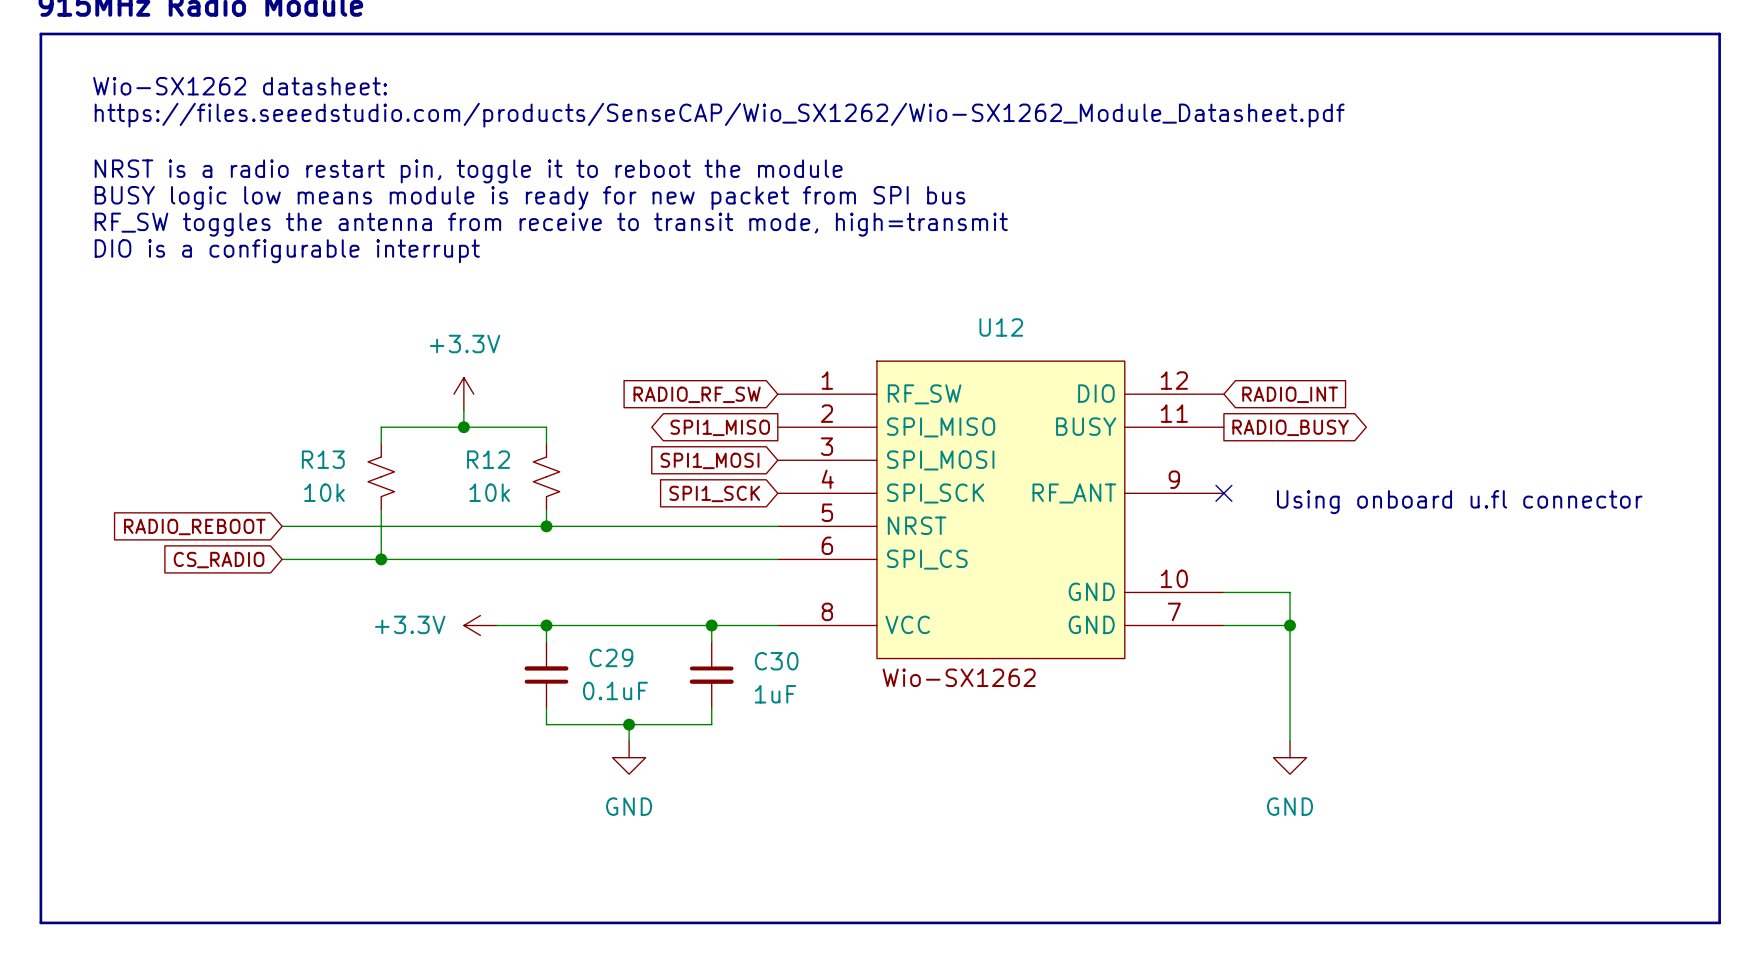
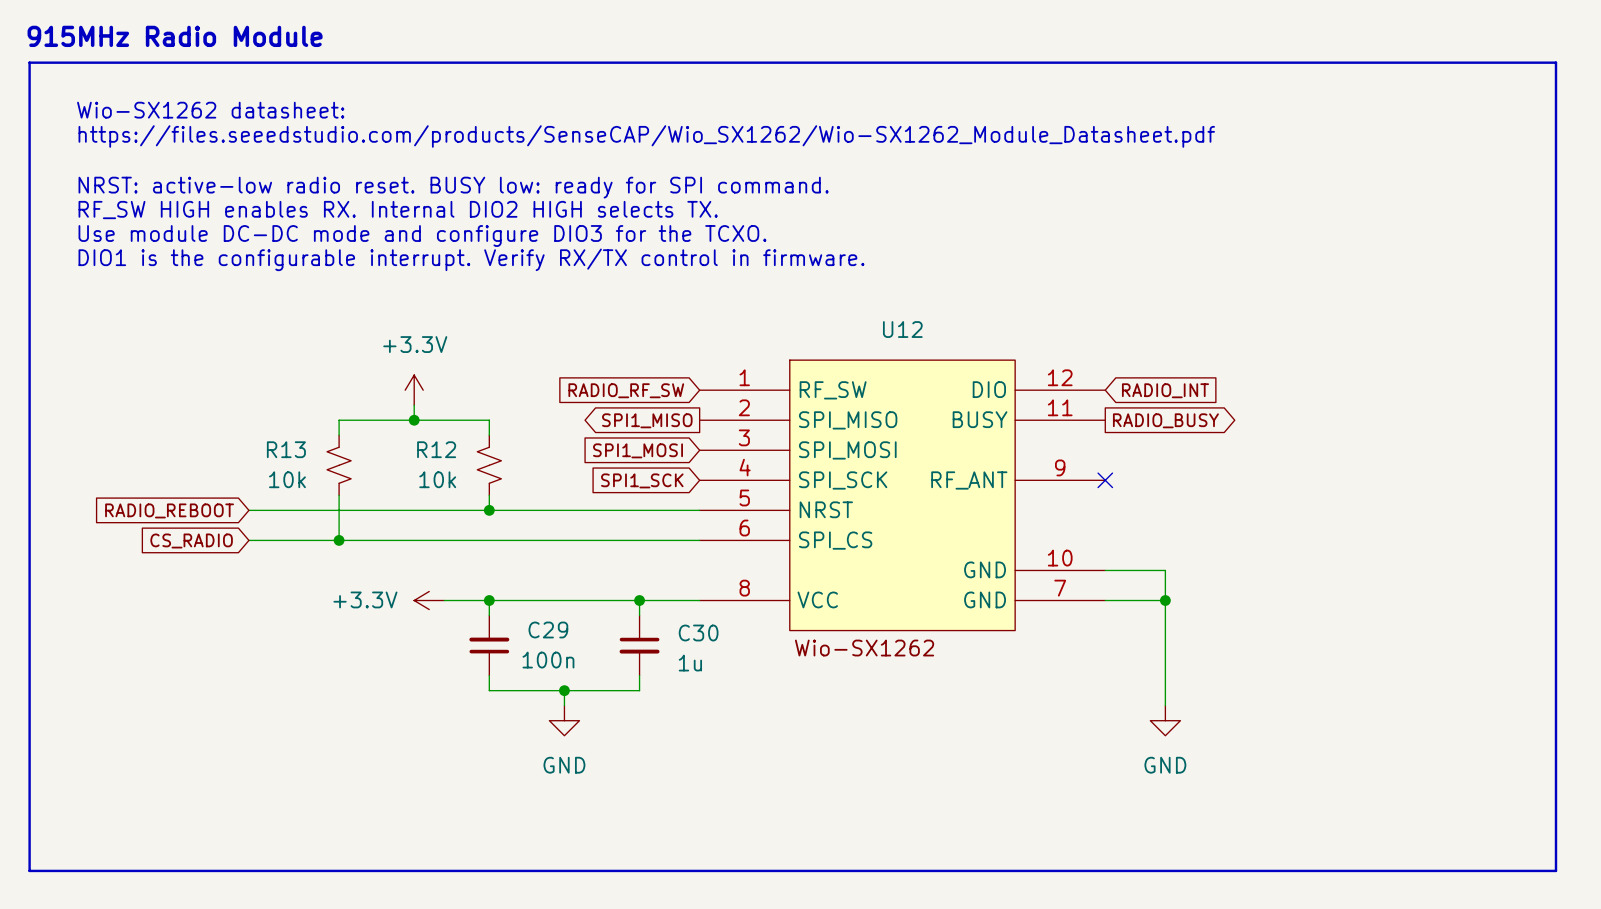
text: NRST is a radio restart pin, toggle it to reboot the module (468, 171) -> NRST: active-low radio reset. BUSY low: ready for SPI command. (453, 187)
text: BUSY logic low means module is ready for new packet from SPI bus (530, 198) -> RF_SW HIGH enables RX. Internal DIO2 HIGH selects TX. (398, 210)
text: RF_SW toggles the antenna from receive to transit mode, high=transmit (551, 224) -> Use module DC-DC mode and configure DIO3 for the TCXO. (422, 236)
text: DIO is a configurable interrupt (287, 251) -> DIO1 is the configurable interrupt. Verify RX/TX control in firmware. (471, 259)
text: Using onboard u.fl connector (1459, 502) -> none
C29 value: 0.1uF (615, 690) -> 100n (548, 660)
C30 value: 1uF (775, 694) -> 1u (690, 663)

